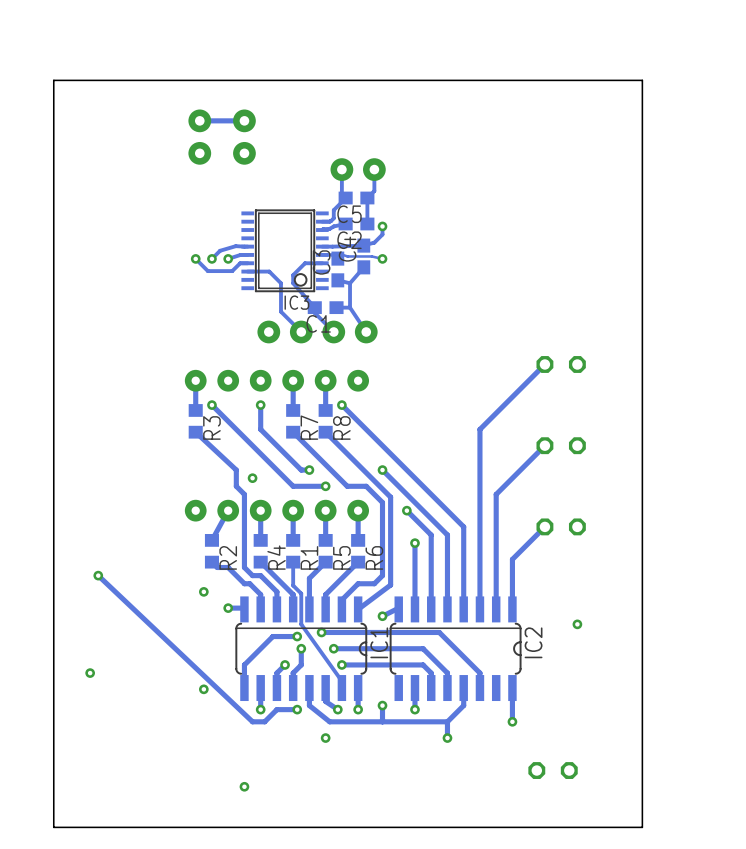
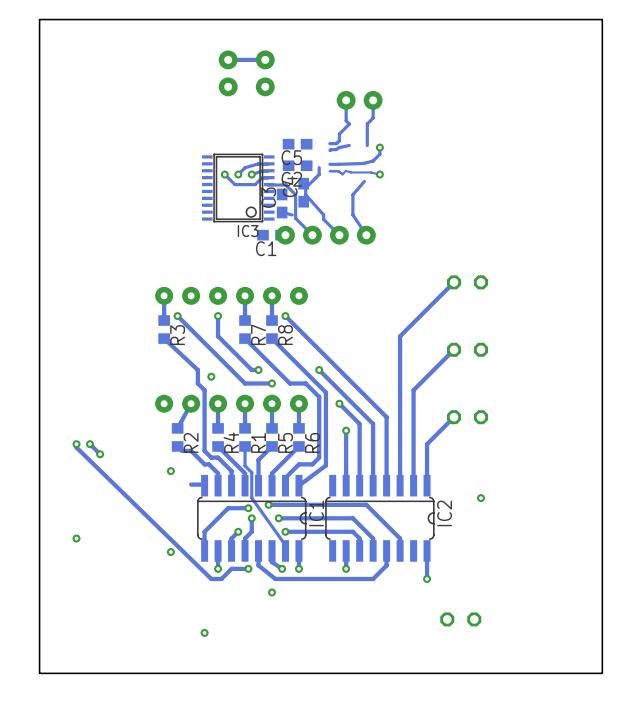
board edge: (642, 80) (53, 80) (53, 827) (642, 827) (642, 80) -> (602, 19) (602, 673) (39, 673) (39, 19) (602, 19)
part: none -> (265, 73)
track: (244, 120) (199, 120) -> (265, 59) (228, 59)
part: (199, 137) -> none
part position: (244, 137) -> (228, 73)
part: none -> (359, 100)
track: (341, 169) (341, 194) (345, 198) (333, 210) (333, 218) (329, 221) (322, 221) -> (346, 100) (346, 120) (349, 124) (339, 134) (339, 140) (336, 143) (329, 143)
part: (358, 169) -> none
track: (374, 169) (374, 191) (367, 198) (367, 223) -> (373, 100) (373, 118) (367, 123) (367, 145)
track: none -> (379, 147) (379, 154) (373, 161) (364, 163) (329, 164)
via: none -> (379, 147)
track: (345, 223) (322, 230) -> (349, 145) (329, 150)
via: (382, 226) -> none
via: none -> (224, 174)
via: none -> (238, 174)
via: none -> (251, 174)
via: none -> (379, 174)
track: (374, 242) (363, 245) (322, 246) -> (312, 181) (305, 187) (305, 194) (323, 214) (323, 219) (339, 235)
track: (247, 246) (235, 246) (220, 250) (211, 258) -> (267, 164) (258, 163) (245, 167) (238, 174)
track: (247, 254) (228, 258) -> (267, 171) (251, 174)
track: (322, 254) (332, 254) (337, 258) (341, 254) (382, 258) -> (329, 171) (338, 171) (342, 174) (345, 170) (379, 174)
track: (195, 258) (207, 271) (232, 271) (240, 263) (247, 263) -> (224, 174) (234, 184) (255, 184) (261, 178) (267, 178)
via: (195, 258) -> none
via: (211, 258) -> none
via: (228, 258) -> none
via: (382, 258) -> none
track: (322, 263) (305, 263) (293, 275) (293, 283) (314, 307) (314, 313) (333, 332) -> none
track: (363, 267) (350, 283) (350, 307) (366, 332) -> (364, 181) (352, 194) (352, 214) (366, 235)
track: (247, 271) (269, 271) (280, 283) (280, 311) (301, 332) -> (267, 185) (285, 185) (295, 194) (295, 218) (312, 235)
part position: (317, 332) -> (325, 235)
via: none -> (76, 444)
track: none -> (89, 444) (100, 454)
via: none -> (89, 444)
via: none -> (100, 454)
track: (98, 575) (252, 721) -> (76, 444) (76, 447) (211, 578)
via: (98, 575) -> none
via: (228, 608) -> none
track: (398, 609) (382, 616) -> none
via: (382, 616) -> none
track: (382, 705) (382, 721) -> none
via: (382, 705) -> none
track: (447, 721) (447, 738) -> none
via: (447, 738) -> none

